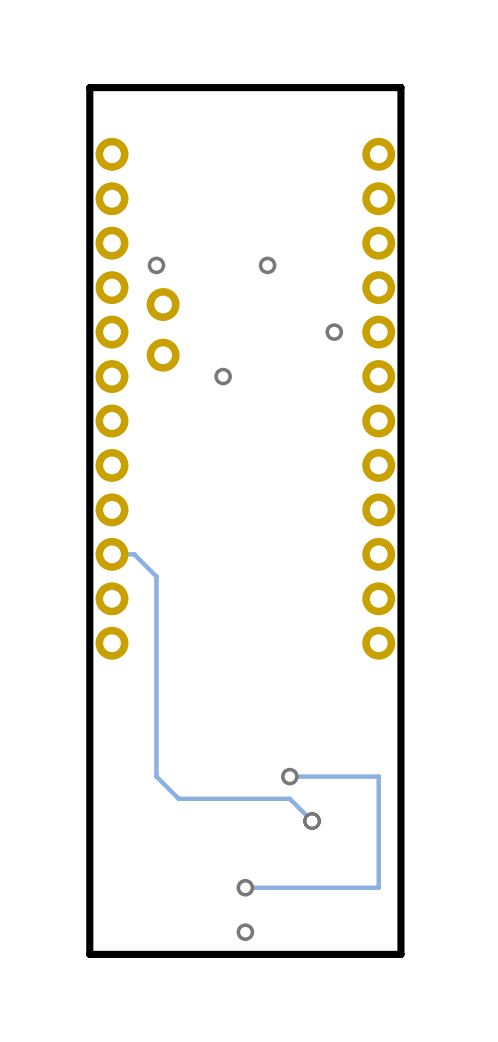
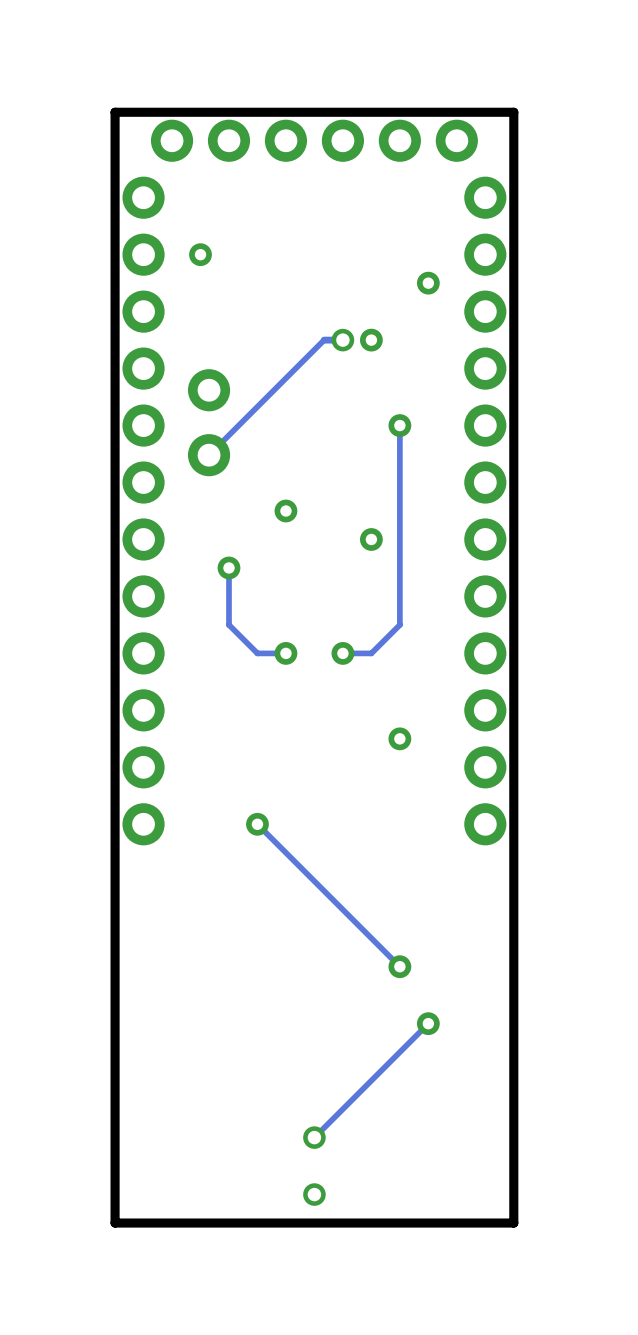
part: none -> (314, 140)
via: none -> (200, 254)
via: none -> (428, 283)
via: (156, 265) -> none
track: none -> (342, 340) (324, 340) (209, 455)
via: none -> (371, 340)
track: none -> (399, 425) (399, 624) (371, 653) (342, 653)
via: none -> (399, 425)
via: (334, 332) -> none
via: (223, 376) -> none
via: none -> (285, 511)
via: none -> (371, 539)
track: none -> (228, 567) (228, 624) (257, 653) (285, 653)
via: none -> (228, 567)
via: none -> (285, 653)
via: none -> (342, 653)
track: (112, 554) (134, 554) (156, 576) (156, 776) (178, 798) (289, 798) (312, 821) -> none
via: none -> (399, 738)
track: none -> (257, 824) (399, 966)
via: none -> (257, 824)
via: none -> (399, 966)
track: (289, 776) (378, 776) (378, 887) (245, 887) -> (428, 1023) (314, 1137)
via: (289, 776) -> none
via: none -> (428, 1023)
via: (312, 821) -> none

